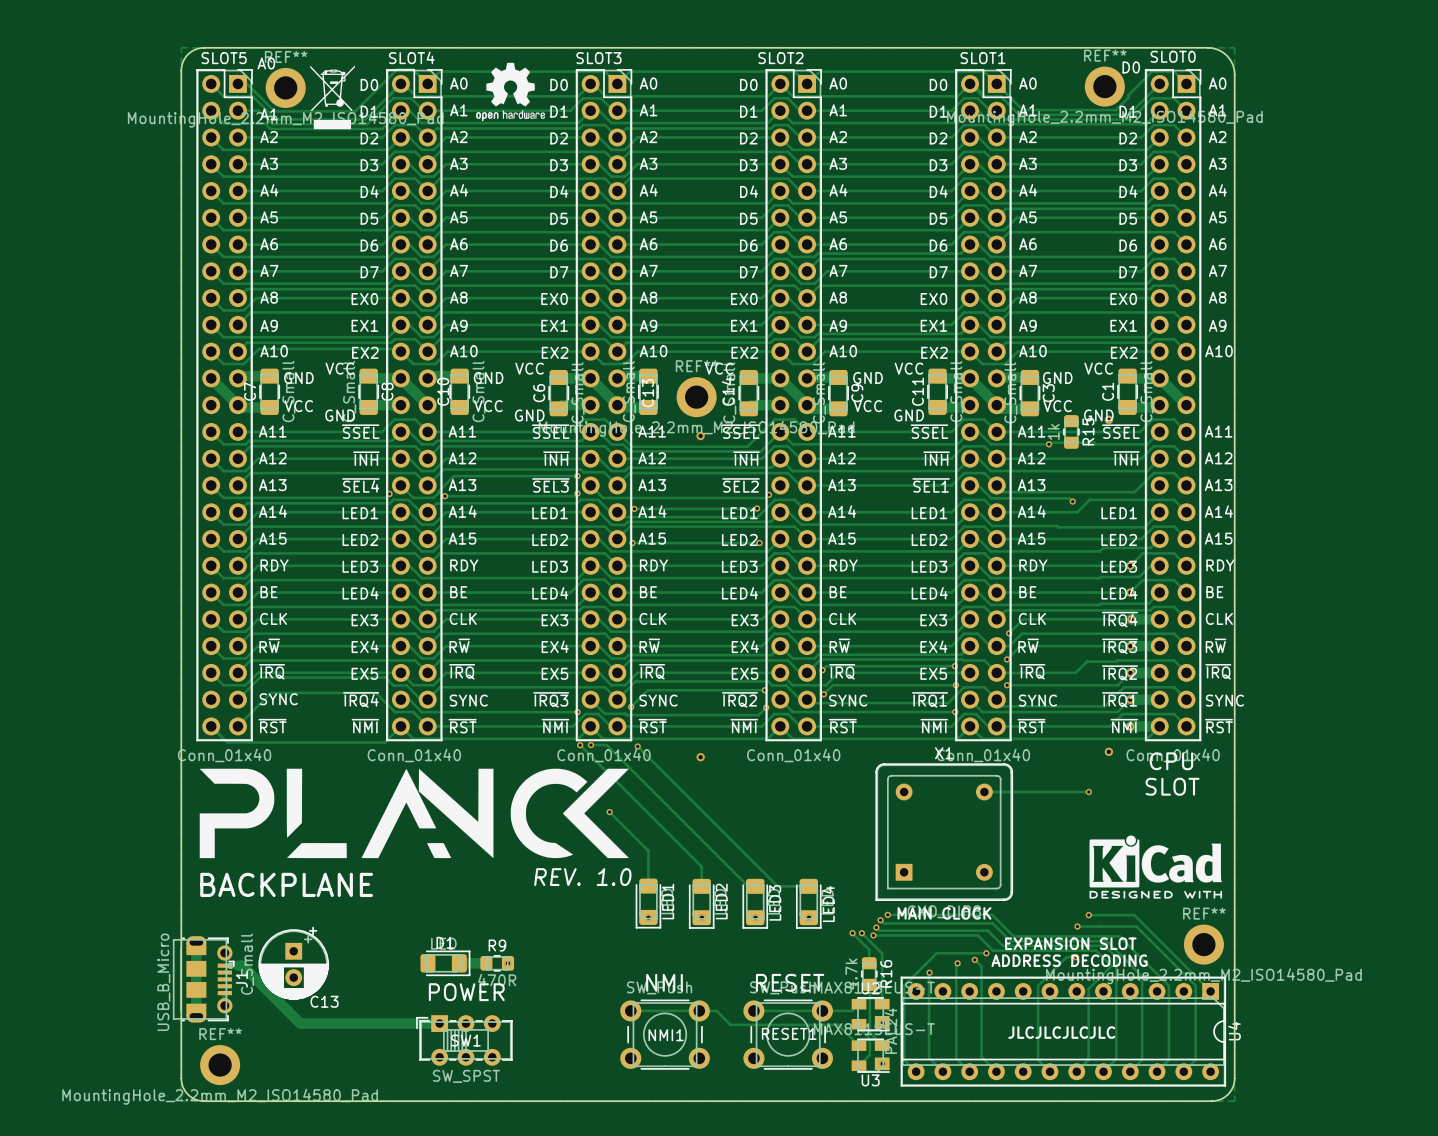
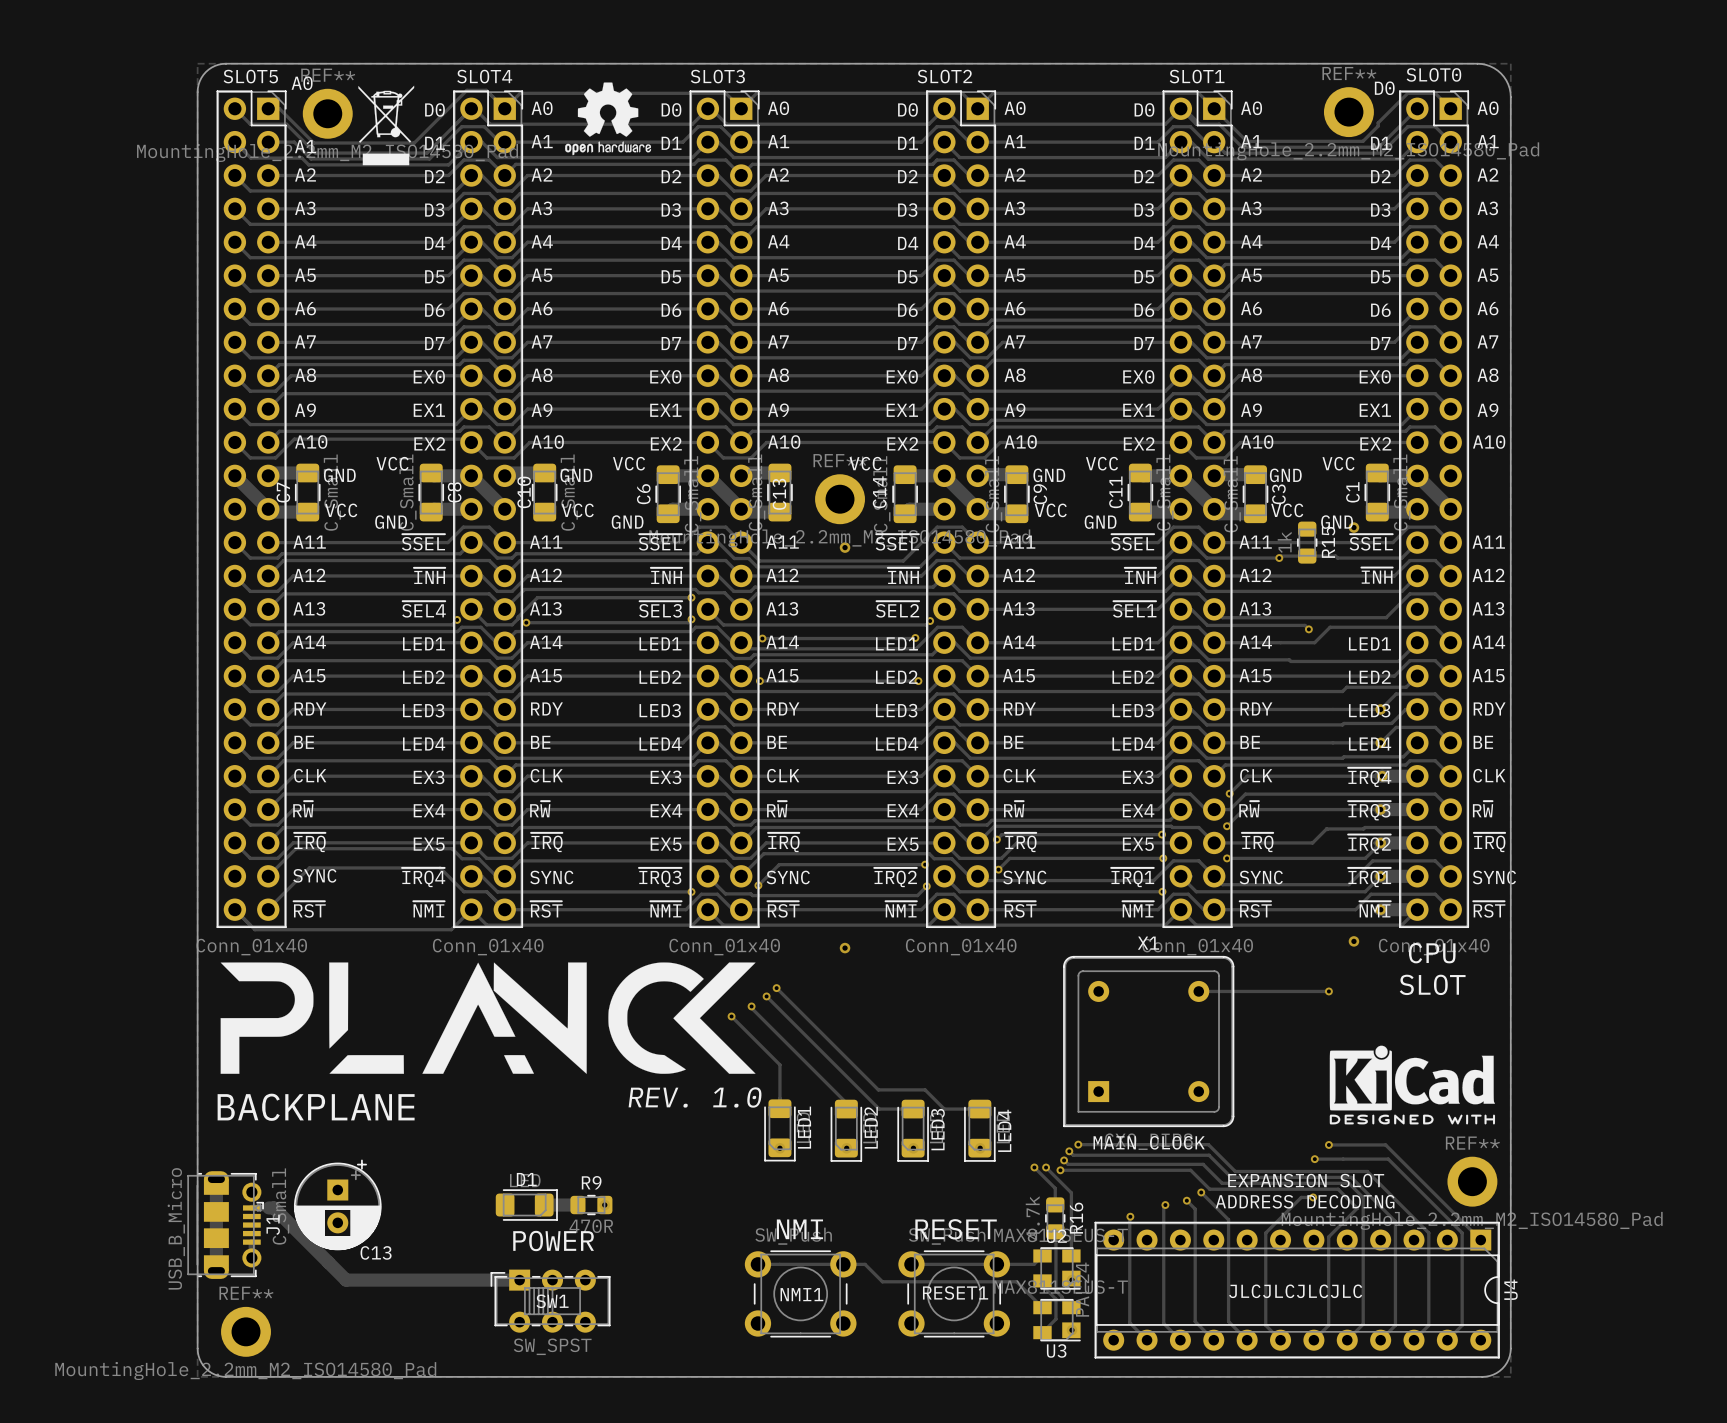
track: (580, 745) (701, 866) (701, 881) -> (751, 1006) (846, 1102)
via: (580, 745) -> none
track: (590, 745) (606, 745) (748, 886) -> (766, 996) (879, 1109) (904, 1109)
via: (590, 745) -> none
track: (637, 746) (777, 886) (780, 886) -> (776, 988) (878, 1089) (925, 1089) (944, 1109)
via: (637, 746) -> none
via: none -> (776, 988)
via: none -> (766, 996)
via: none -> (751, 1006)
track: (986, 953) (936, 953) (904, 985) (904, 1059) (916, 1071) -> (1201, 1192) (1228, 1219) (1228, 1321) (1247, 1340)

